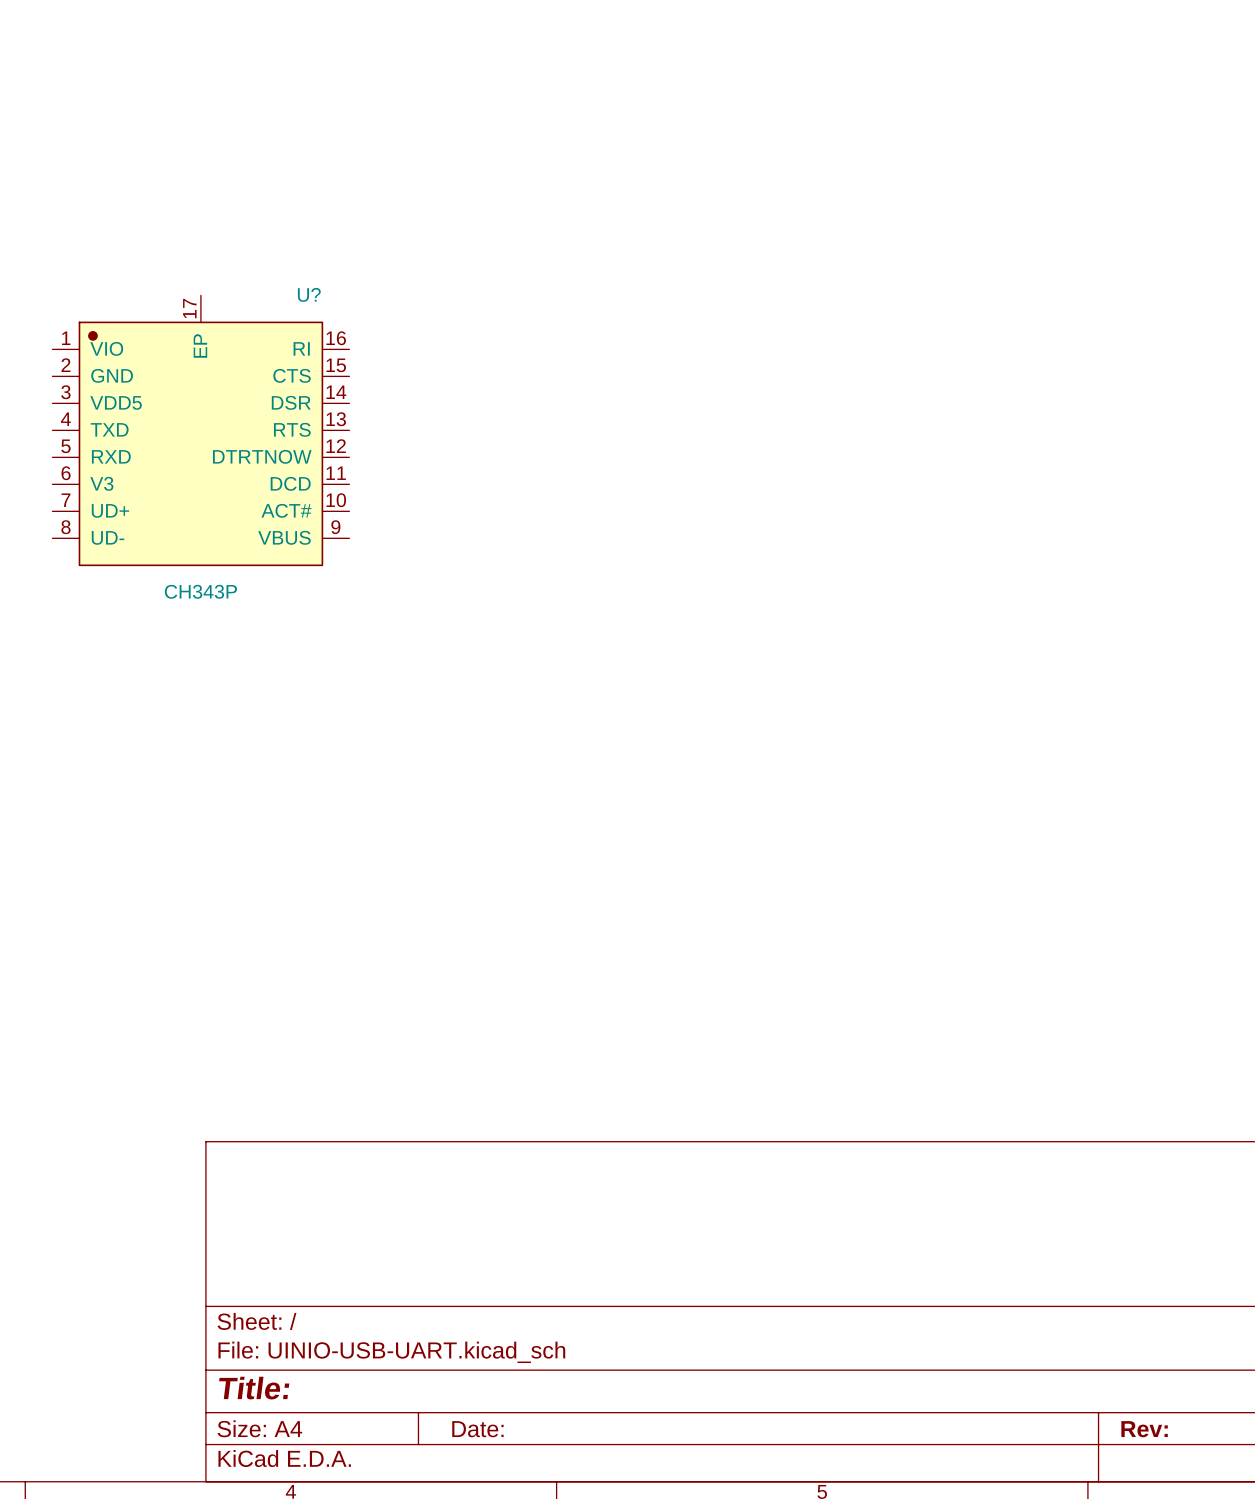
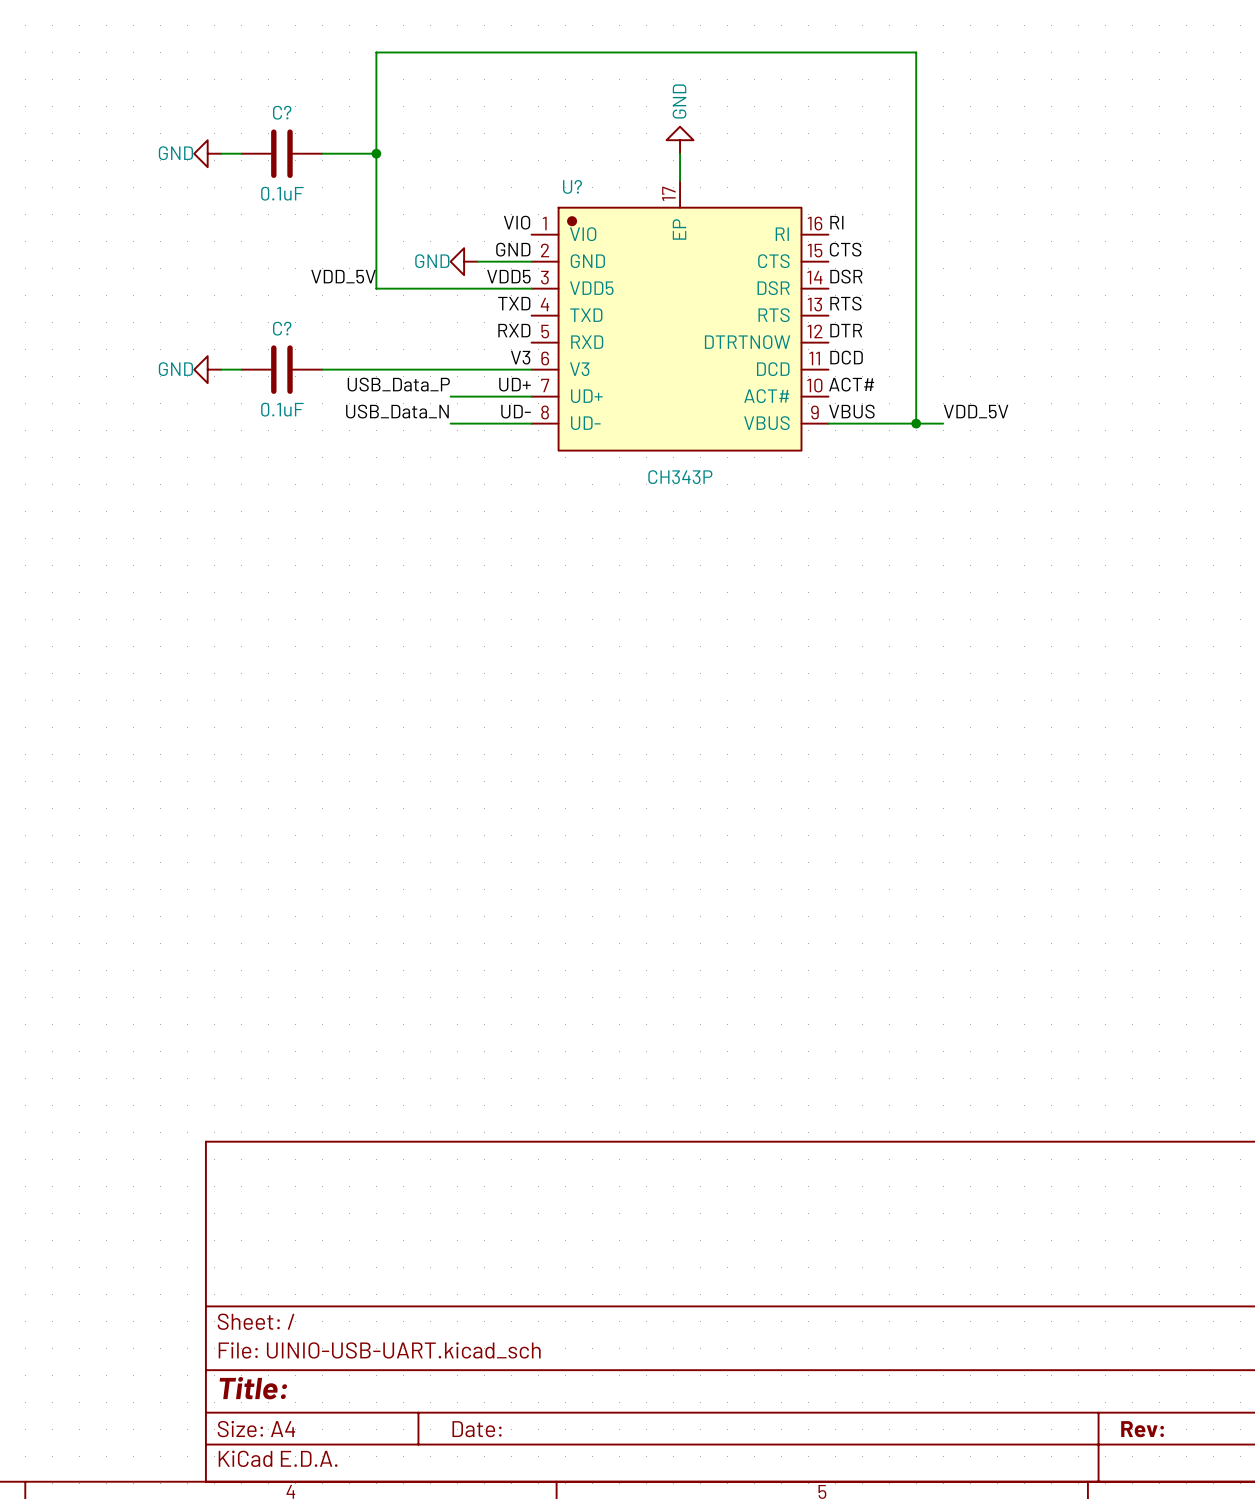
power symbol: none -> GND (680, 140)
power symbol: none -> GND (207, 153)
wire: none -> (221, 153) (241, 153)
C?: none -> 0.1uF (281, 153)
wire: none -> (322, 153) (376, 153)
junction: none -> (376, 153)
wire: none -> (680, 153) (680, 180)
label: none -> VIO (517, 222)
label: none -> RI (836, 222)
label: none -> GND (513, 249)
label: none -> CTS (845, 249)
power symbol: none -> GND (464, 261)
wire: none -> (477, 261) (531, 261)
label: none -> VDD5 (508, 276)
label: none -> DSR (846, 276)
label: none -> VDD_5V (343, 276)
wire: none -> (531, 288) (376, 288) (376, 52) (916, 52) (916, 423)
label: none -> TXD (514, 303)
label: none -> RTS (845, 303)
U?: none -> CH343P (680, 316)
label: none -> RXD (514, 330)
label: none -> DTR (846, 330)
label: none -> V3 (520, 357)
label: none -> DCD (846, 357)
power symbol: none -> GND (207, 369)
C?: none -> 0.1uF (281, 369)
wire: none -> (322, 369) (531, 369)
label: none -> UD+ (515, 384)
label: none -> ACT# (851, 384)
label: none -> USB_Data_P (398, 384)
wire: none -> (450, 396) (531, 396)
label: none -> UD- (516, 411)
label: none -> VBUS (851, 411)
label: none -> USB_Data_N (397, 411)
label: none -> VDD_5V (976, 411)
wire: none -> (450, 423) (531, 423)
wire: none -> (828, 423) (943, 423)
junction: none -> (916, 423)
U?: CH343P (200, 430) -> none

